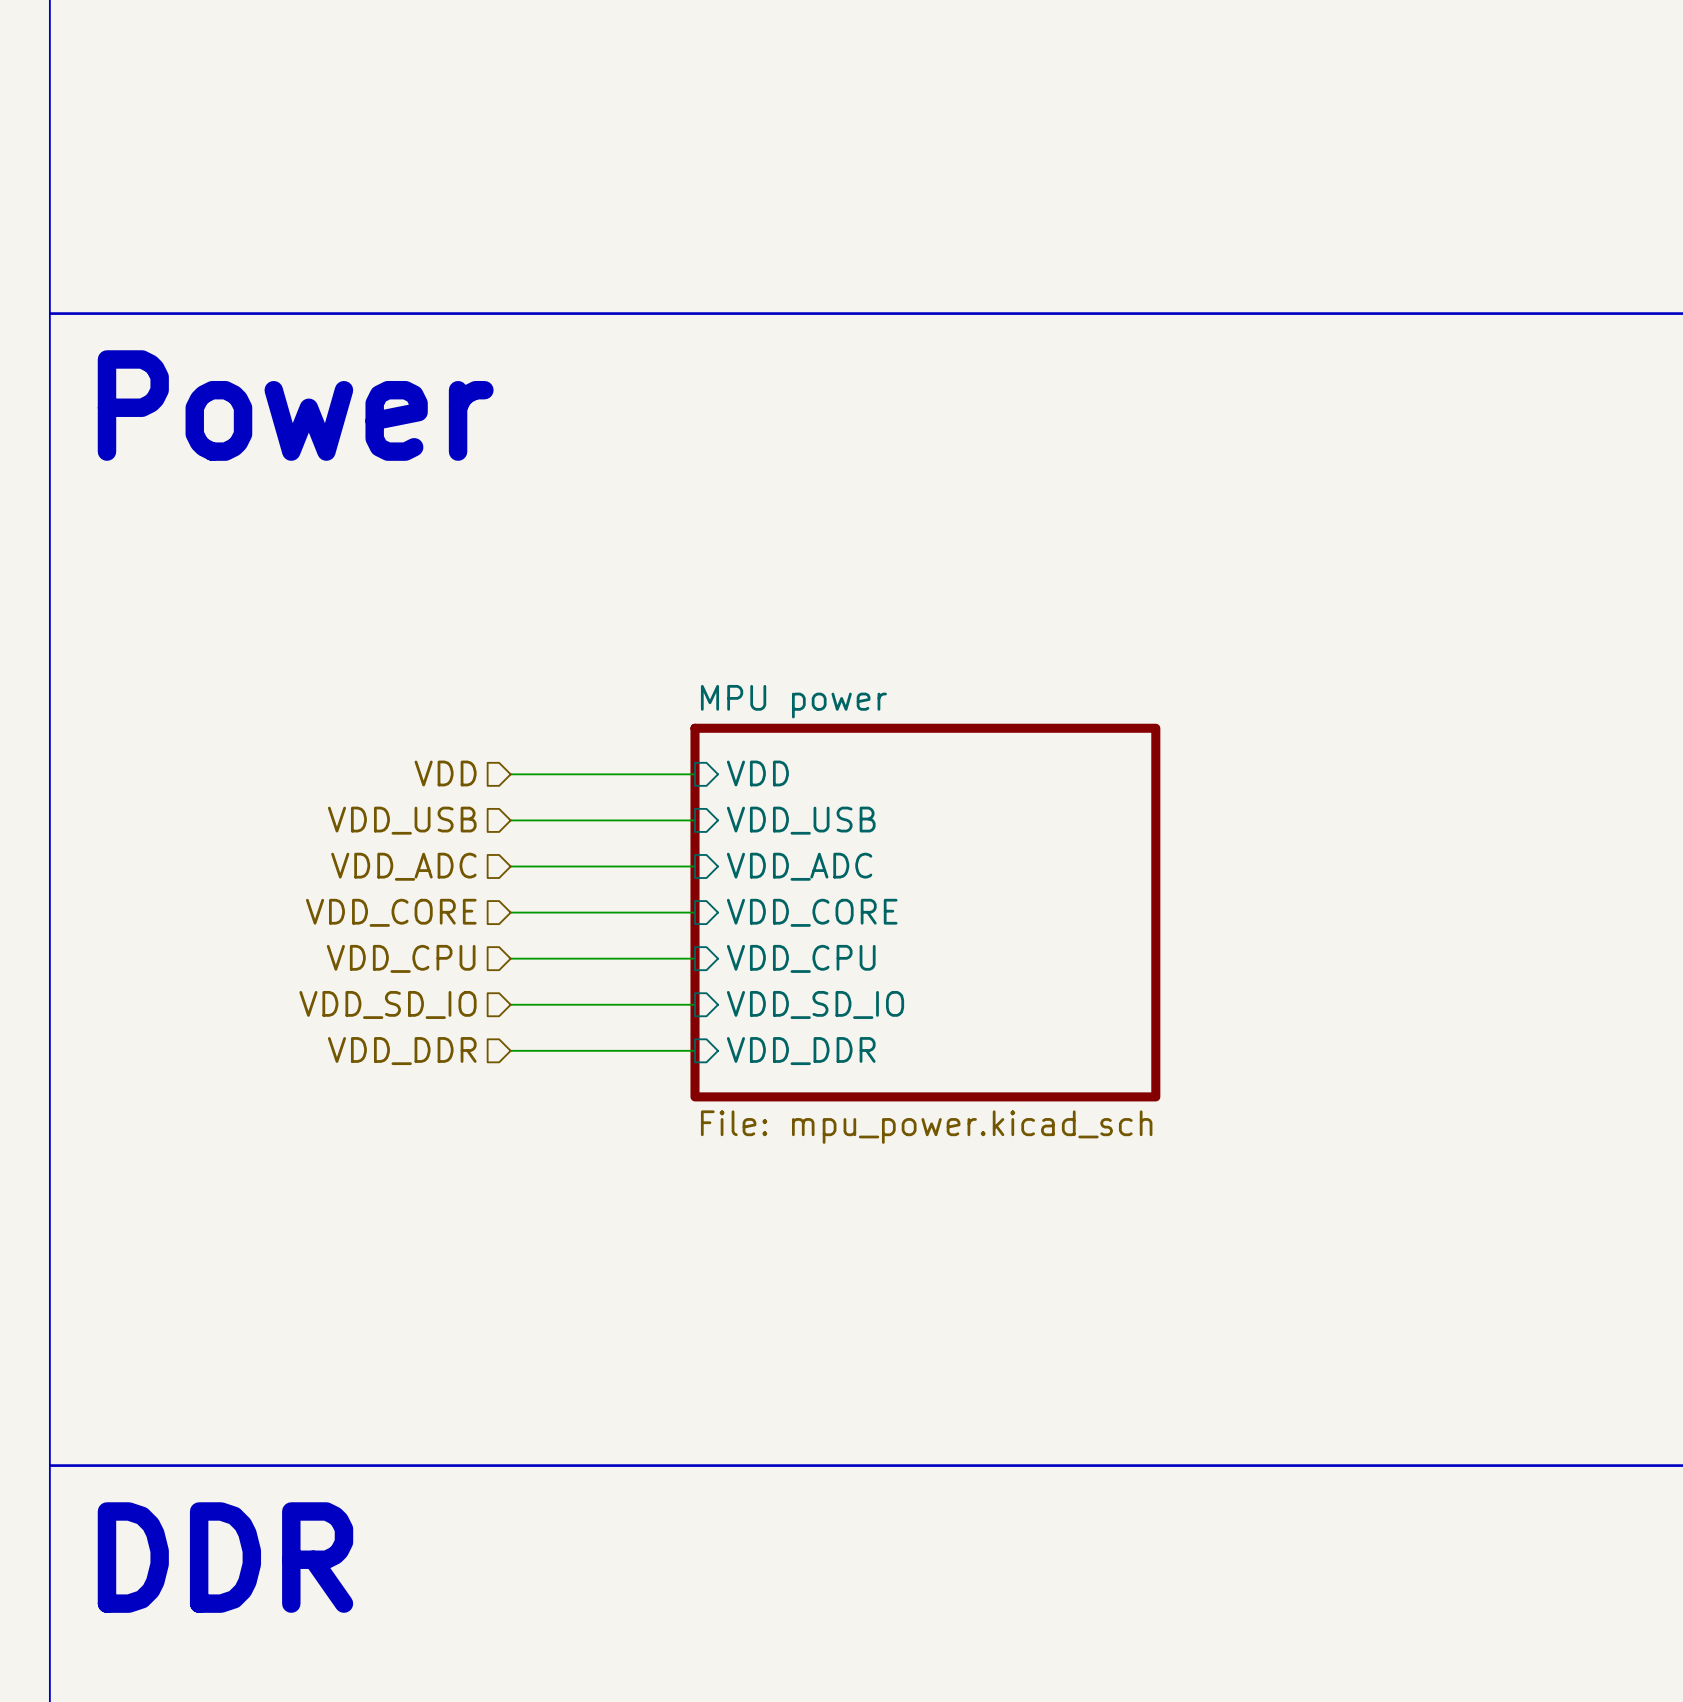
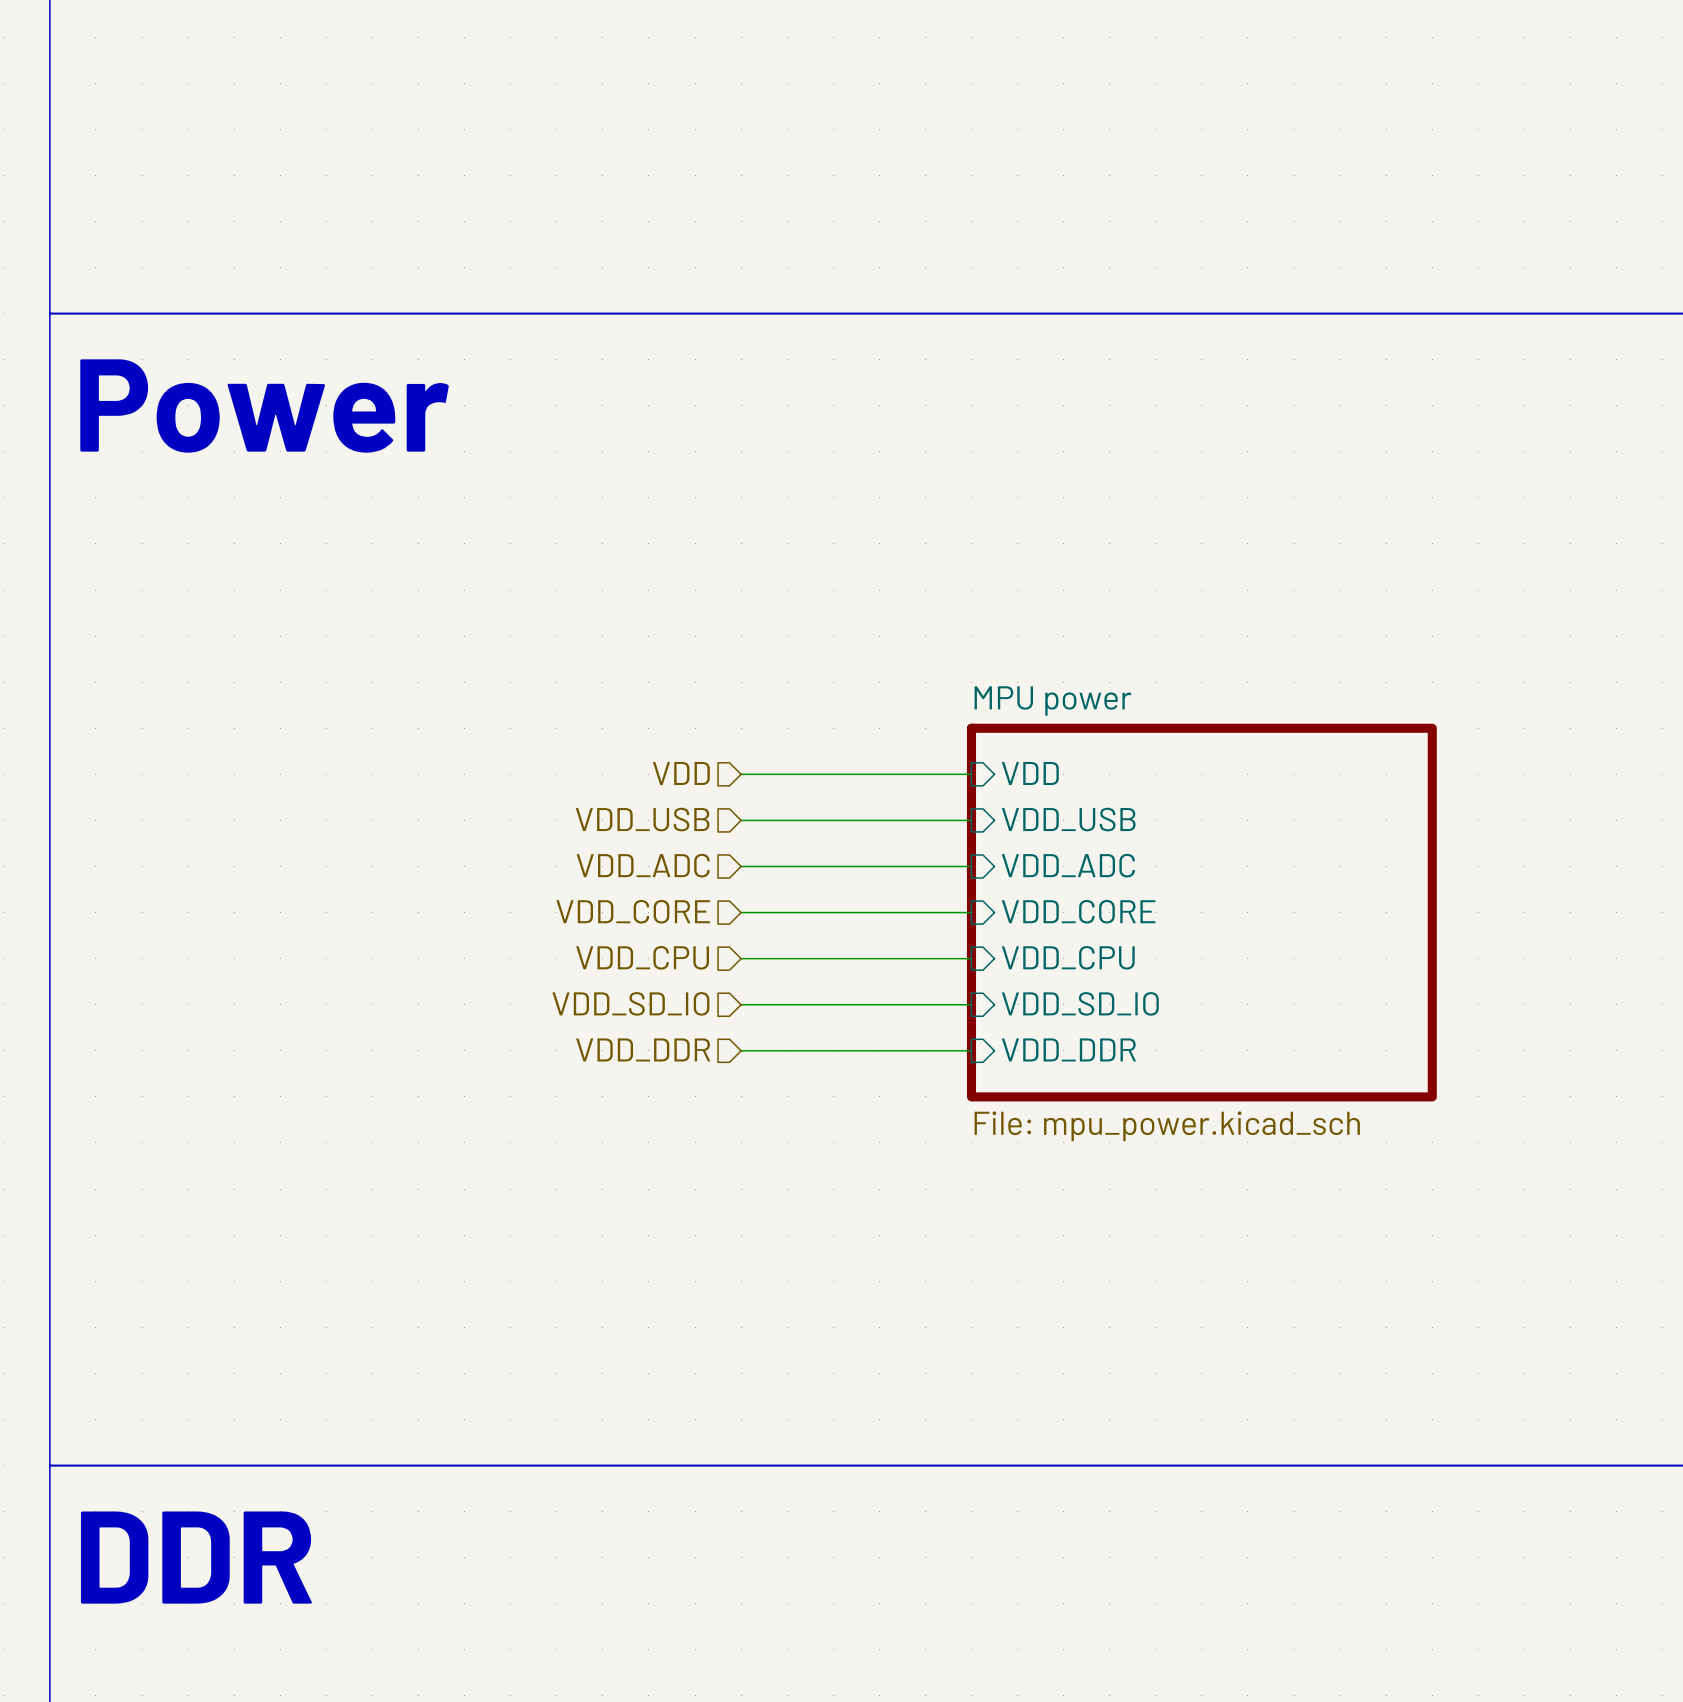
hierarchical label position: VDD (445, 773) -> VDD (681, 773)
sheet pin position: VDD (757, 773) -> VDD (1030, 773)
wire: (510, 774) (695, 774) -> none
wire: none -> (741, 774) (971, 774)
hierarchical label position: VDD_USB (402, 820) -> VDD_USB (642, 819)
wire: (510, 820) (695, 820) -> none
wire: none -> (741, 820) (971, 820)
sheet pin position: VDD_USB (801, 820) -> VDD_USB (1068, 819)
hierarchical label position: VDD_ADC (403, 866) -> VDD_ADC (643, 865)
wire: (510, 866) (695, 866) -> none
wire: none -> (741, 866) (971, 866)
sheet pin position: VDD_ADC (799, 866) -> VDD_ADC (1068, 865)
hierarchical label position: VDD_CORE (391, 912) -> VDD_CORE (633, 911)
wire: (510, 912) (695, 912) -> none
wire: none -> (741, 912) (971, 912)
sheet pin position: VDD_CORE (812, 912) -> VDD_CORE (1078, 911)
sheet MPU power position: (925, 912) -> (1201, 912)
hierarchical label position: VDD_CPU (401, 958) -> VDD_CPU (642, 957)
wire: (510, 958) (695, 958) -> none
wire: none -> (741, 958) (971, 958)
sheet pin position: VDD_CPU (801, 958) -> VDD_CPU (1068, 957)
hierarchical label position: VDD_SD_IO (387, 1004) -> VDD_SD_IO (630, 1003)
wire: (510, 1004) (695, 1004) -> none
wire: none -> (741, 1004) (971, 1004)
sheet pin position: VDD_SD_IO (815, 1004) -> VDD_SD_IO (1080, 1003)
wire: (510, 1050) (695, 1050) -> none
wire: none -> (741, 1050) (971, 1050)
hierarchical label position: VDD_DDR (402, 1051) -> VDD_DDR (643, 1049)
sheet pin position: VDD_DDR (801, 1051) -> VDD_DDR (1068, 1049)

